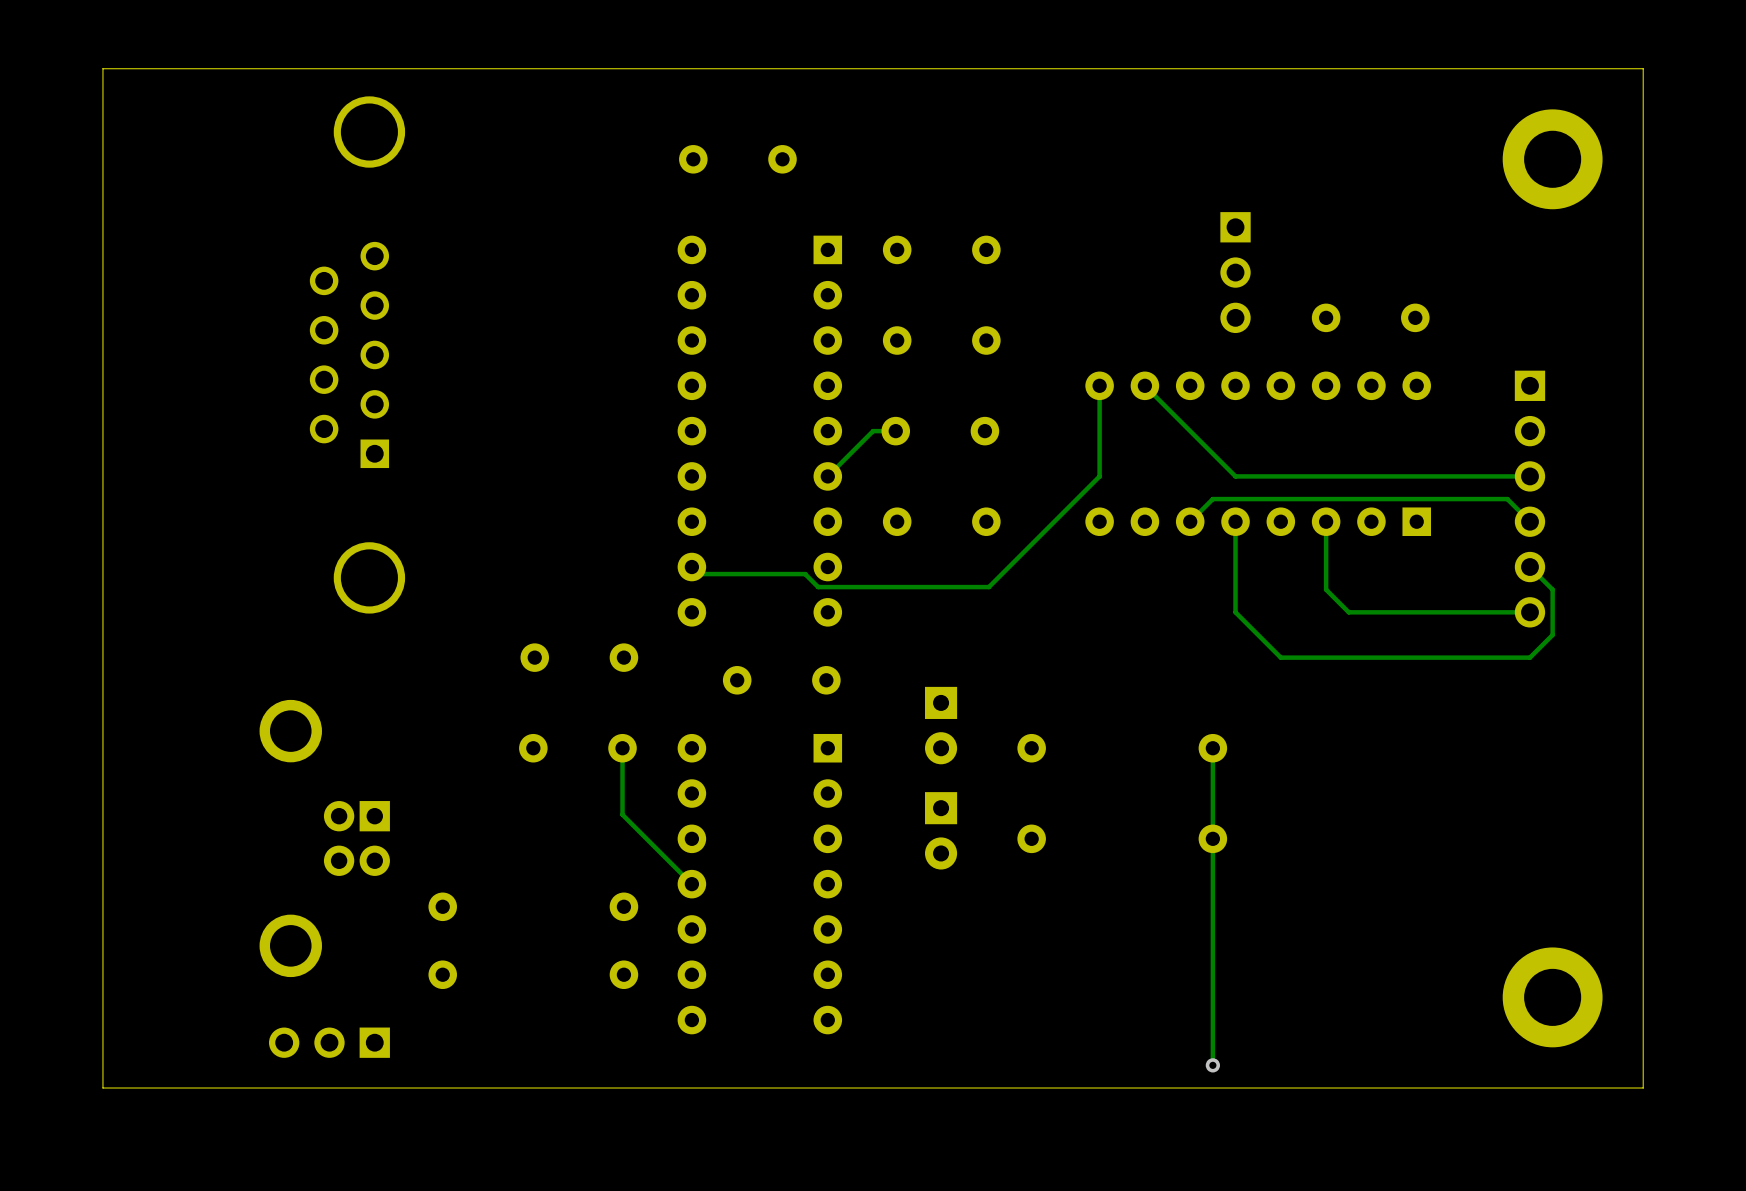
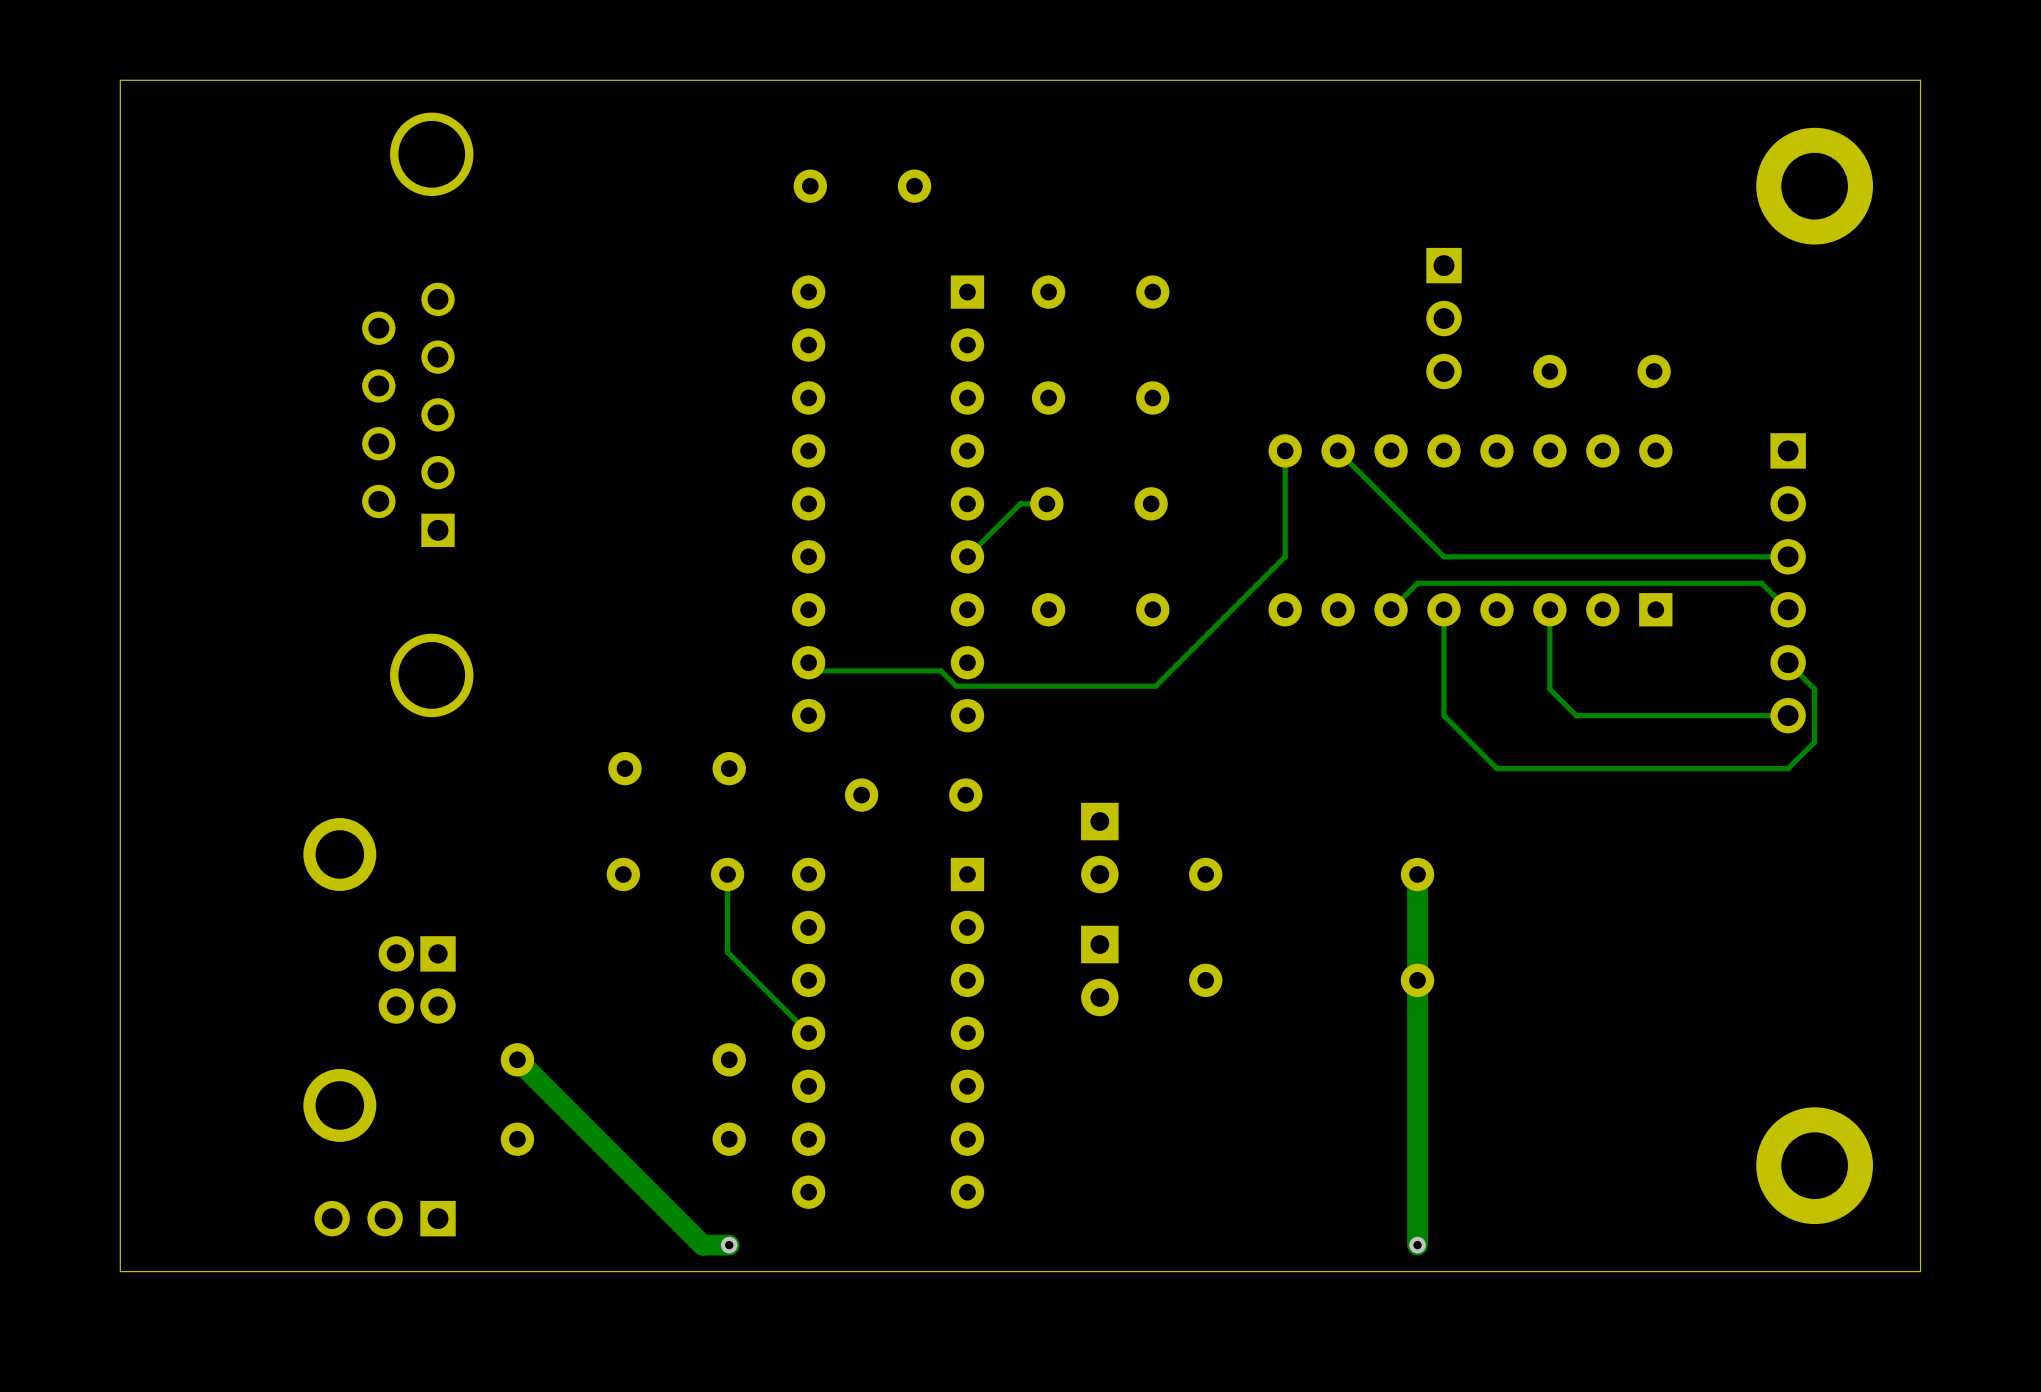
track width: thin (1212, 748) (1212, 1065) -> thick (1417, 874) (1417, 1245)
track: none -> (517, 1059) (702, 1245) (729, 1245)
via: none -> (729, 1245)

